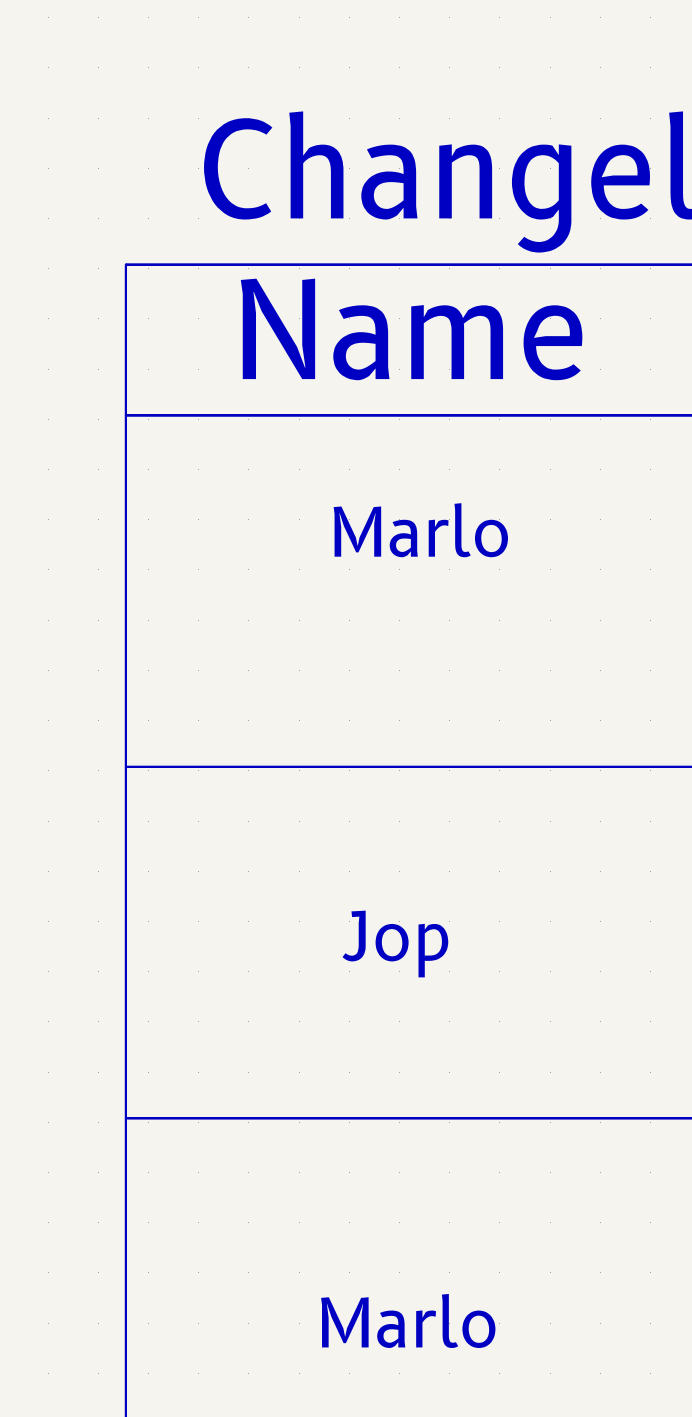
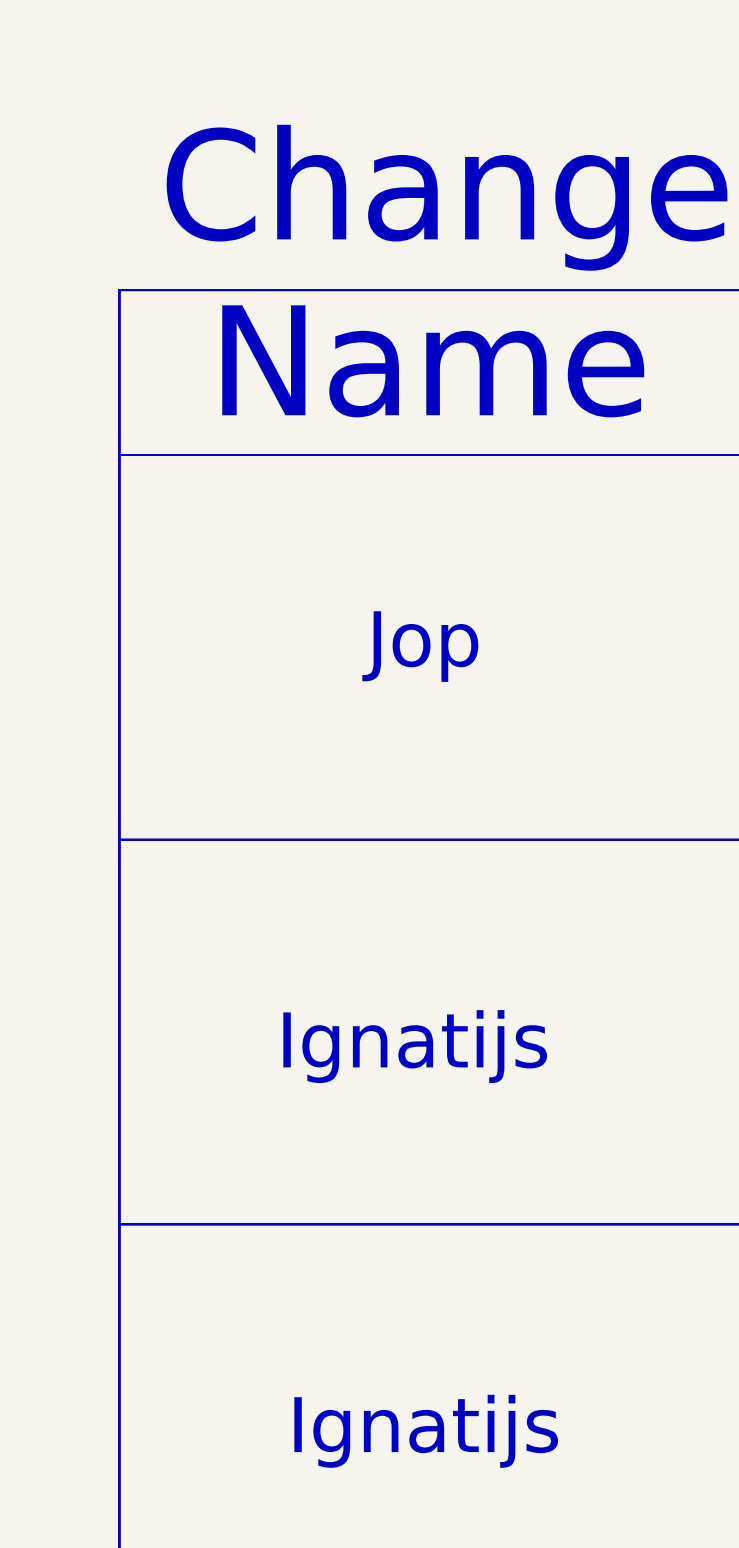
text: Marlo (420, 530) -> none
text position: Jop (395, 944) -> Jop (420, 646)
text: none -> Ignatijs (415, 1046)
text: none -> Ignatijs (426, 1431)
text: Marlo (408, 1320) -> none

